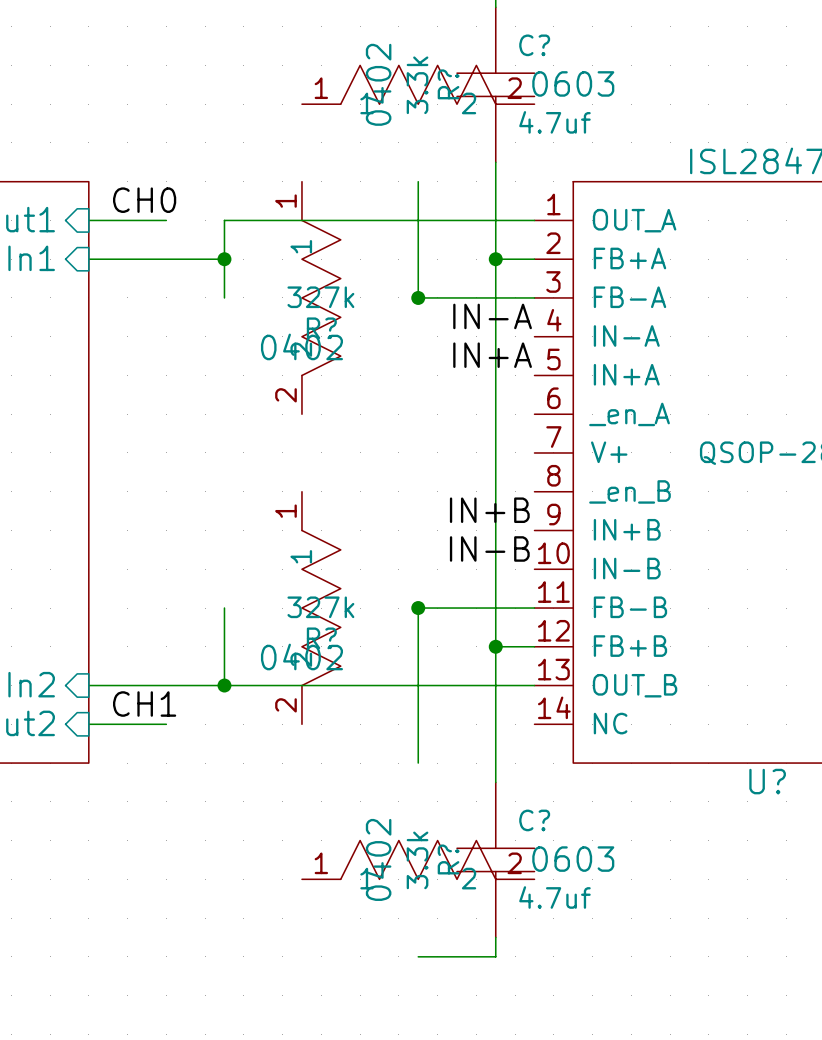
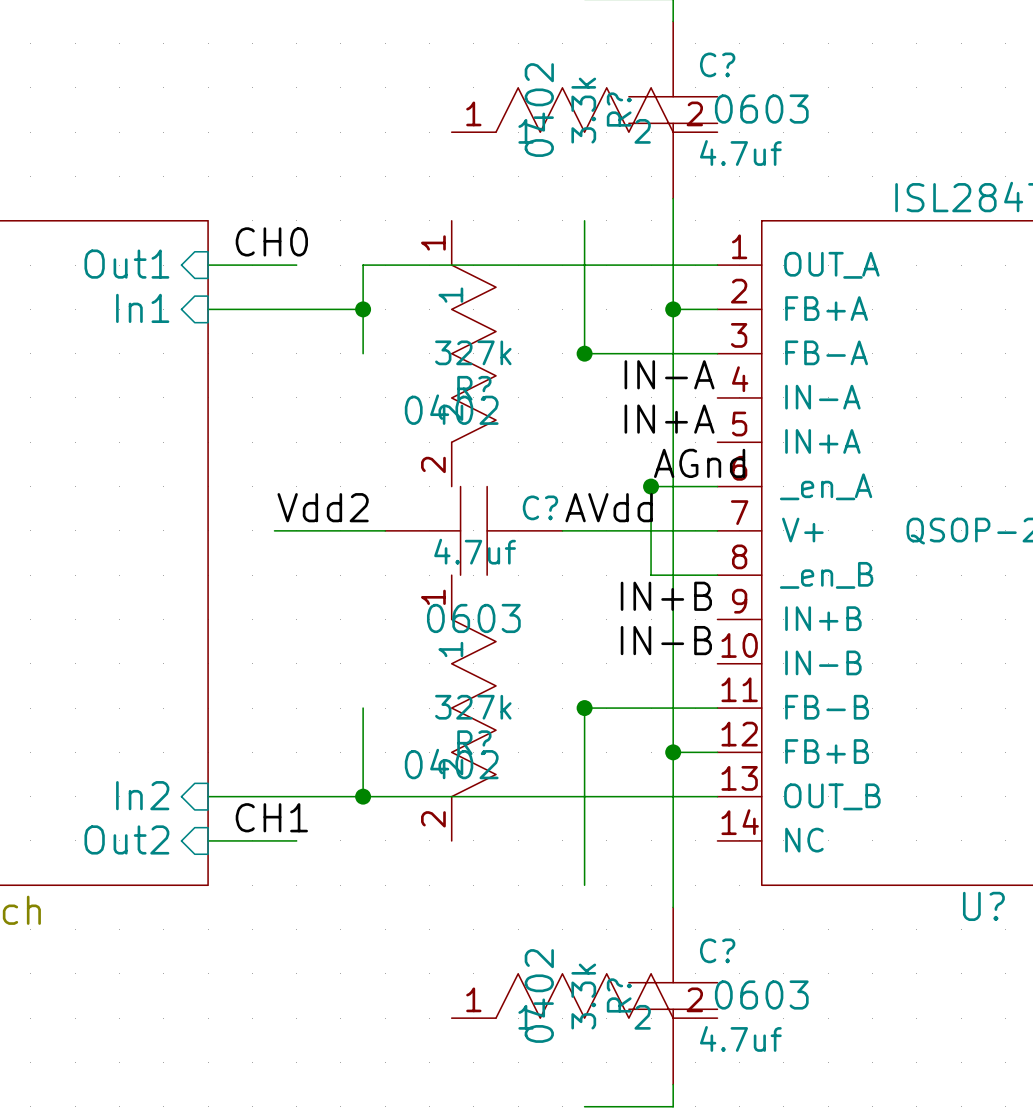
label: none -> AGnd (699, 463)
junction: none -> (651, 486)
wire: none -> (717, 486) (651, 486) (651, 575) (717, 575)
label: none -> Vdd2 (323, 507)
label: none -> AVdd (609, 507)
wire: none -> (274, 530) (385, 530)
C?: none -> 4.7uf (473, 530)
wire: none -> (562, 530) (717, 530)

